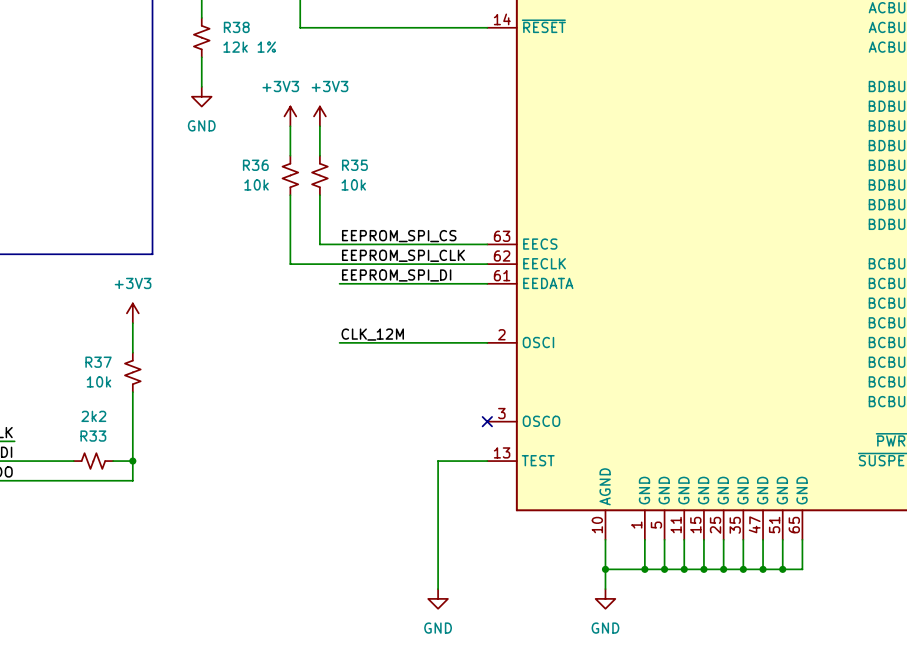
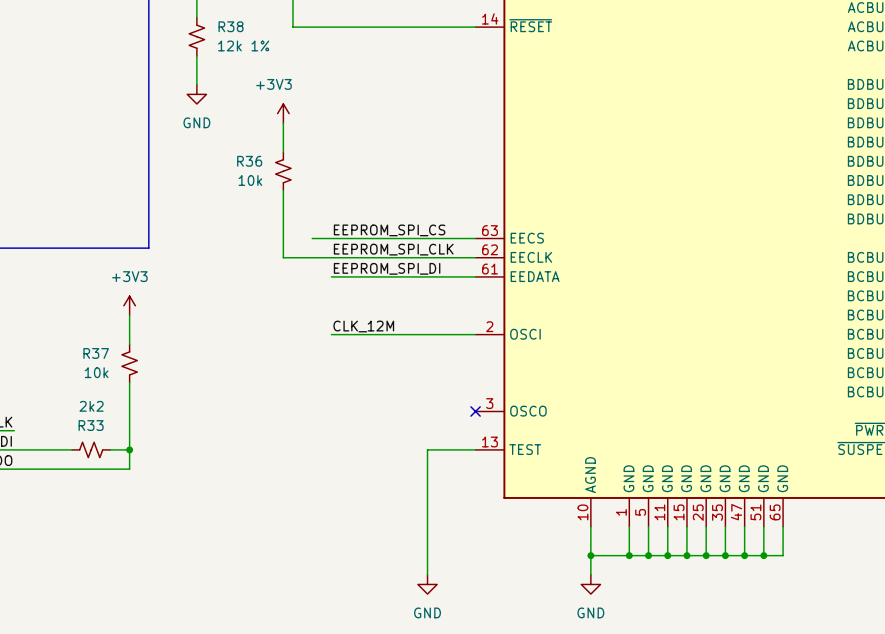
power symbol: +3V3 (319, 116) -> none
wire: (319, 126) (319, 155) -> none
R35: 10k (319, 175) -> none
wire: (319, 195) (319, 244) -> none

